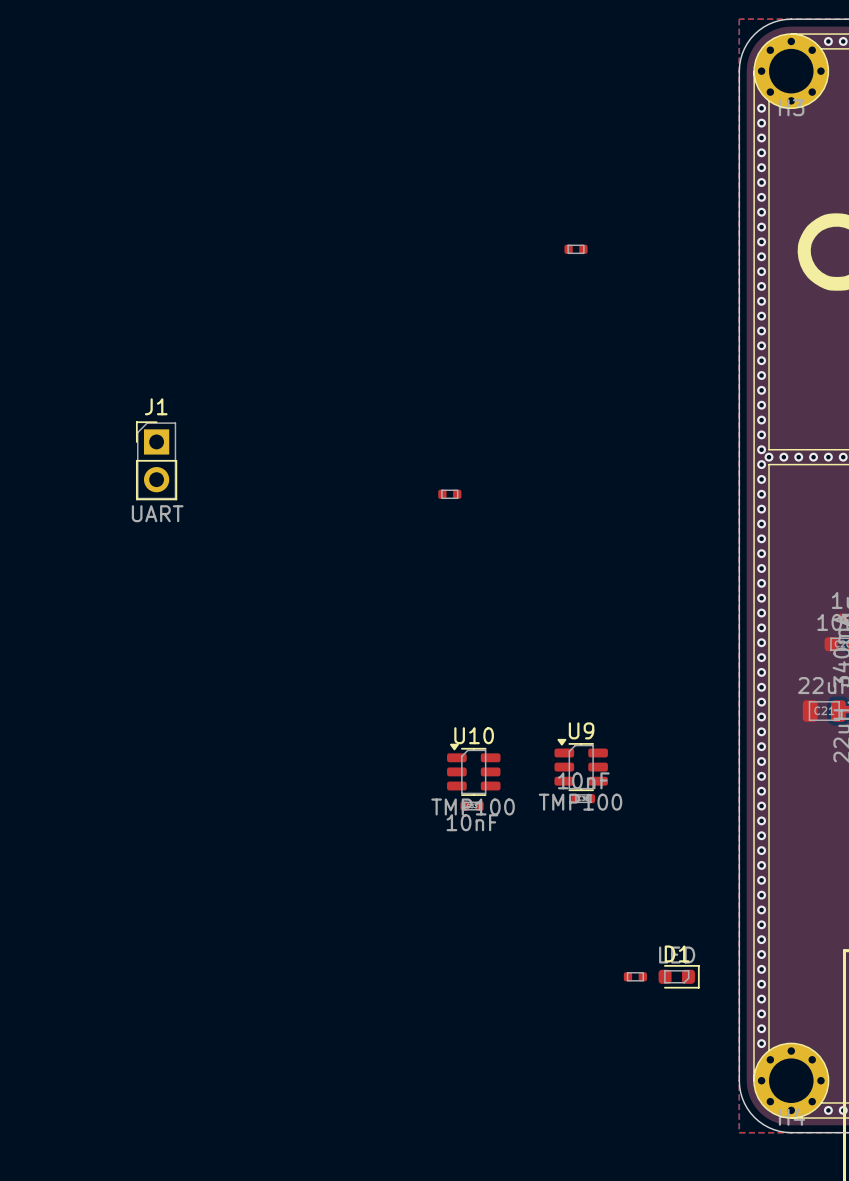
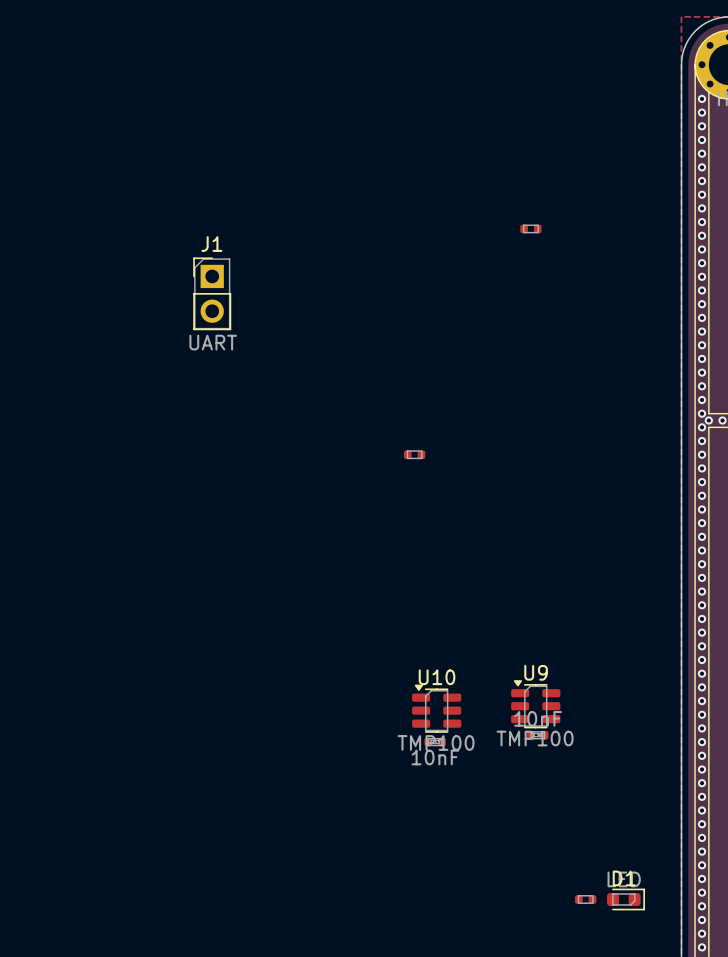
J1 position: (156, 460) -> (212, 293)

